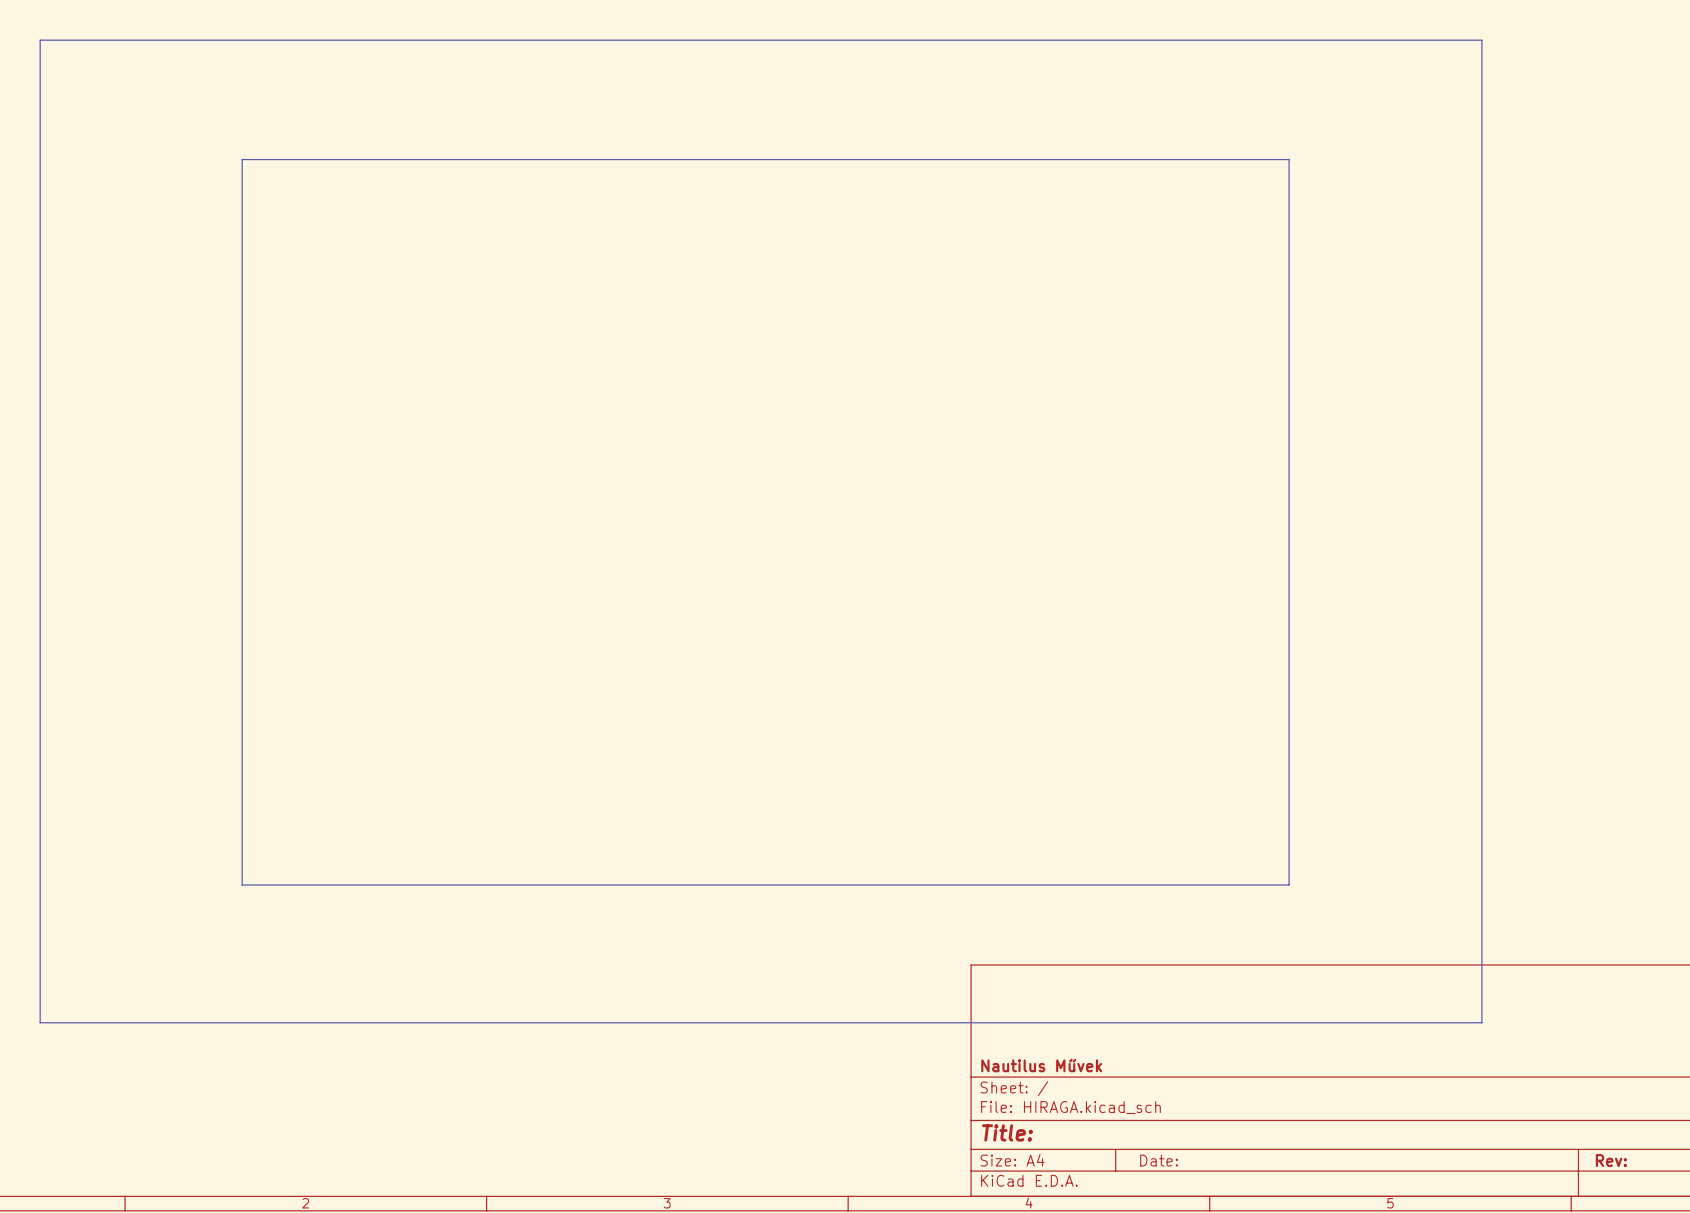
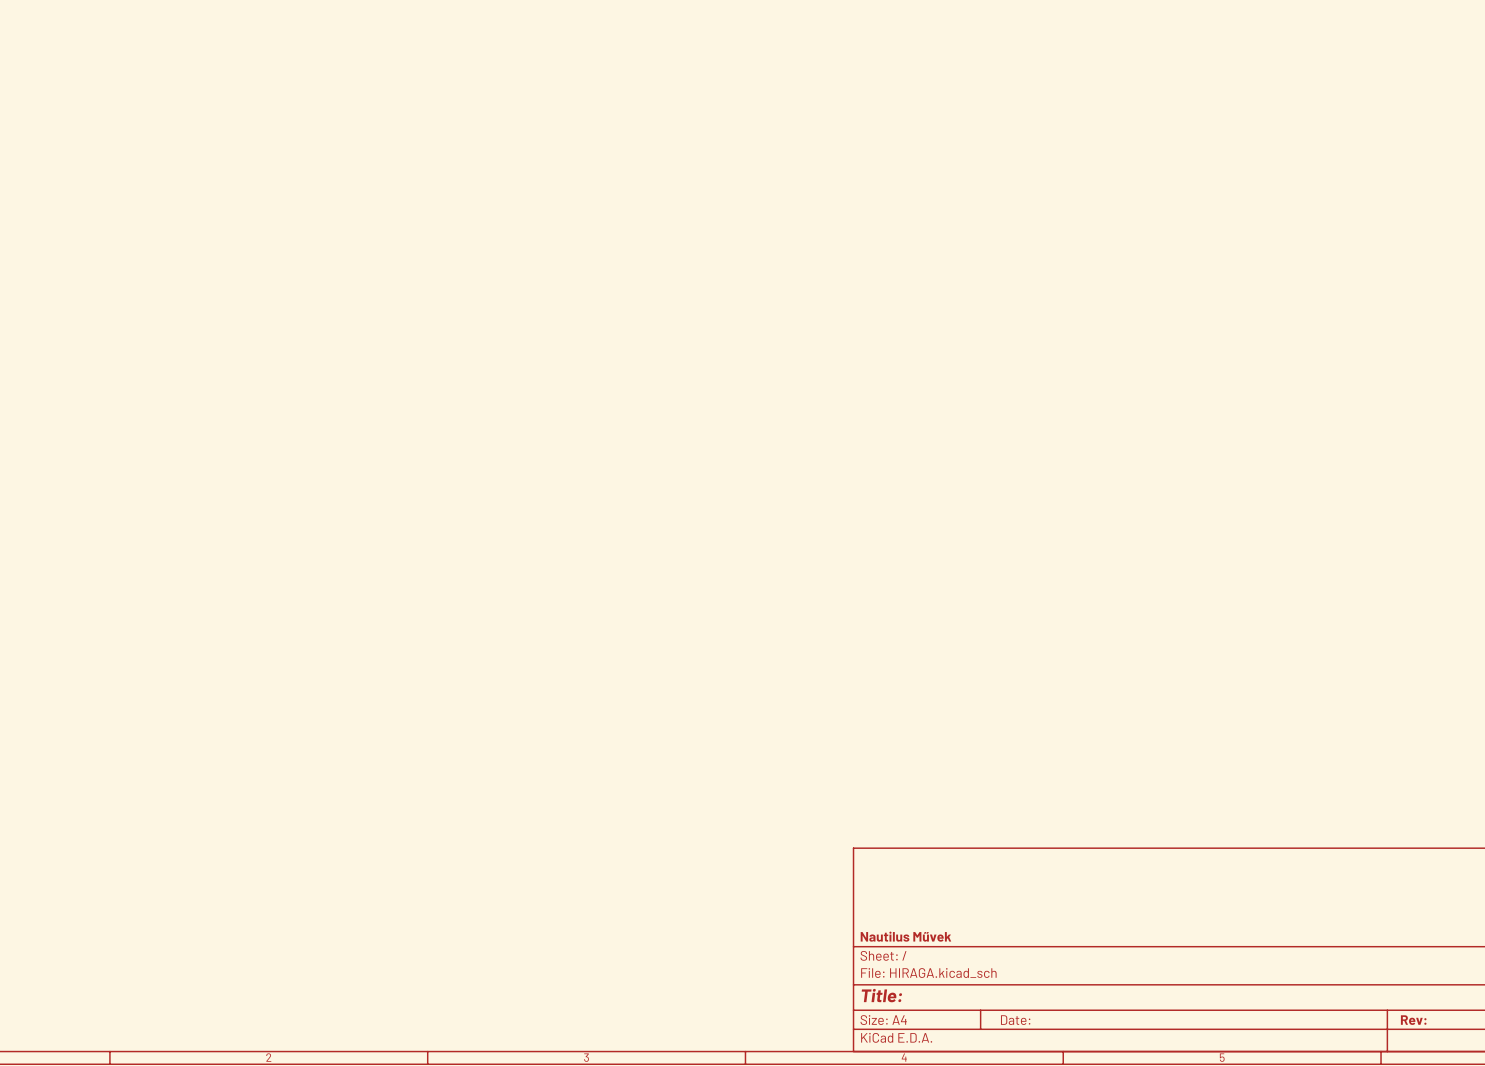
line: (40, 40) (1481, 40) (1481, 1022) (40, 1022) (40, 40) -> none
line: (242, 159) (242, 885) (1289, 885) (1289, 159) (242, 159) -> none

